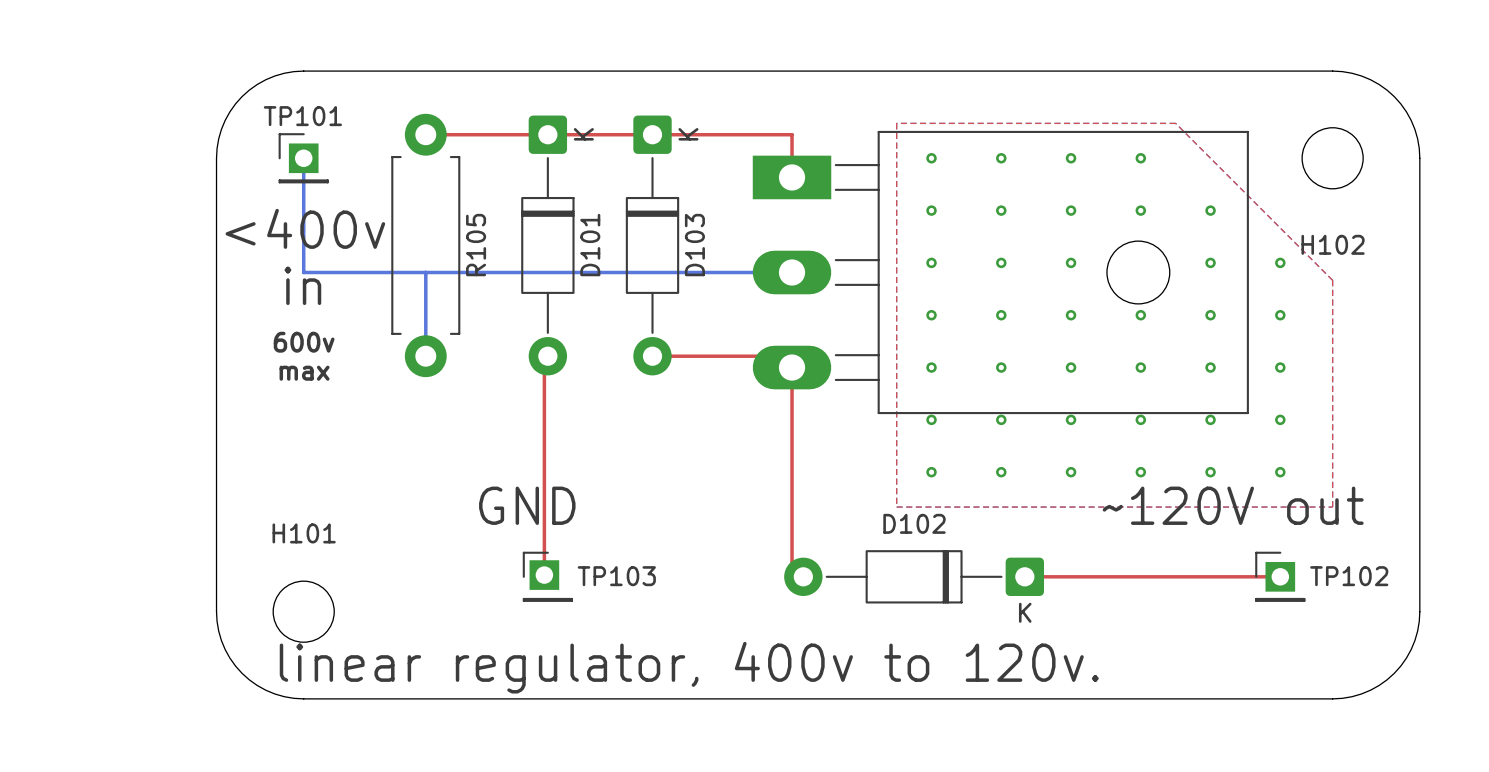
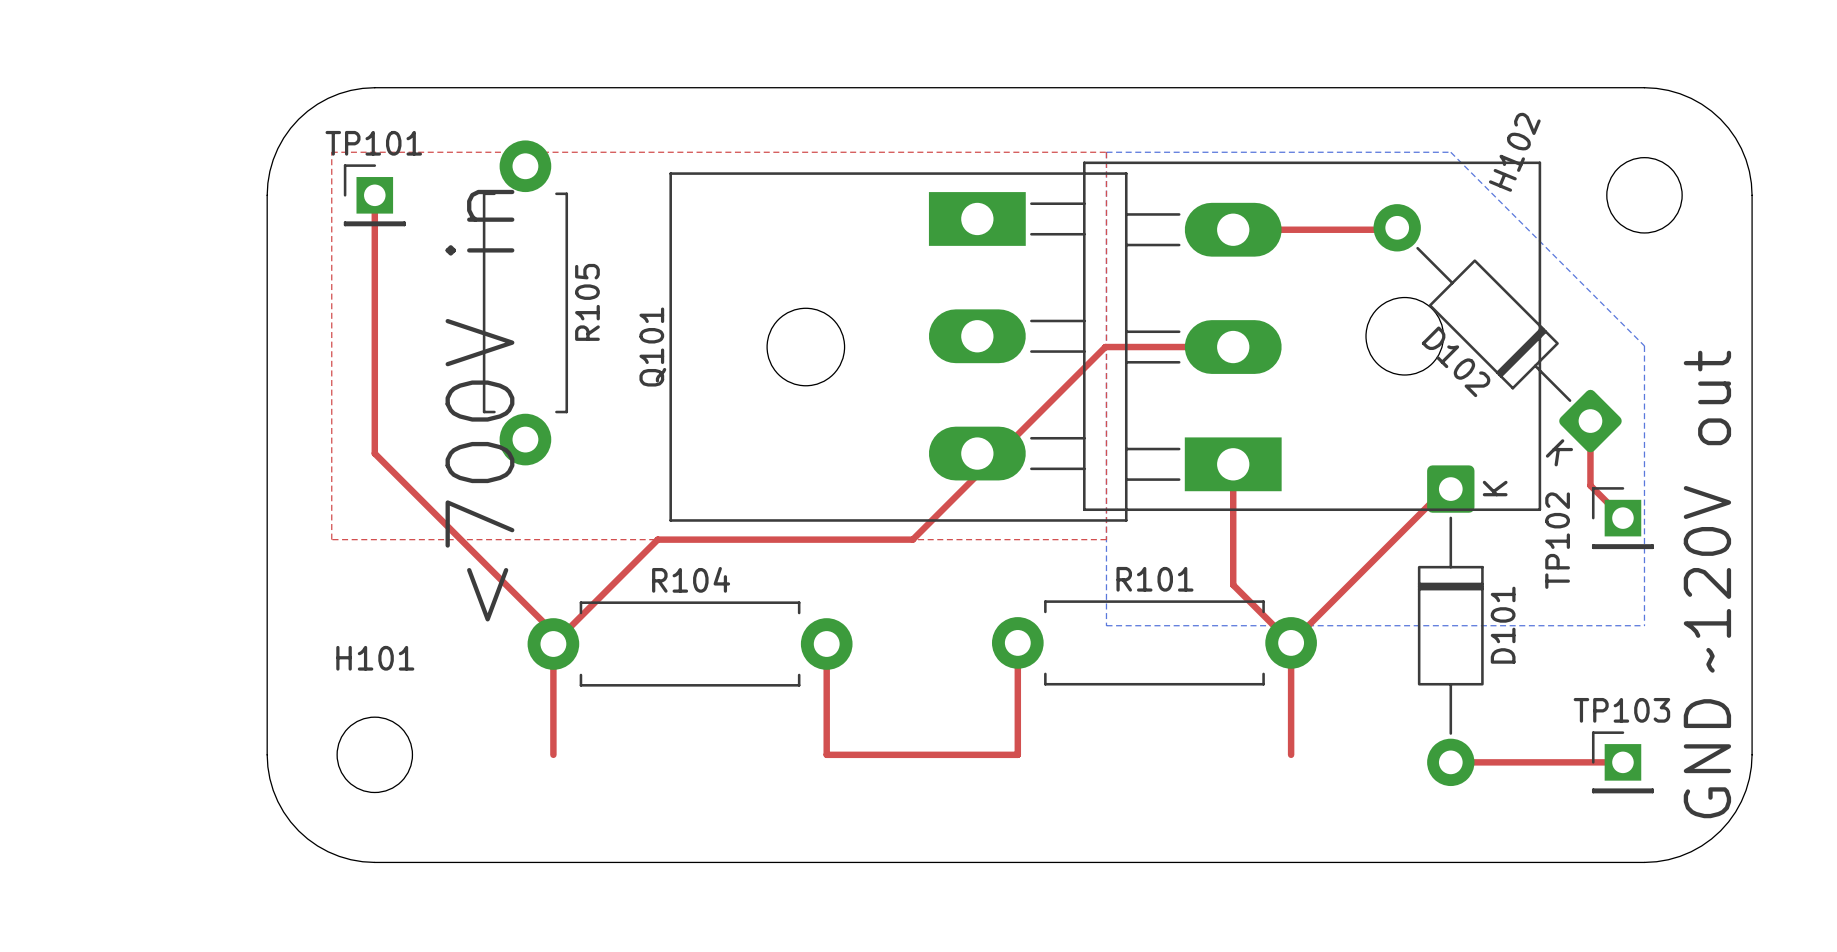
top zone outline: (896, 123) (1175, 123) (1332, 280) (1332, 507) (896, 507) (896, 437) -> (1106, 152) (331, 152) (331, 539) (1106, 539)
top track: (425, 134) (792, 134) (792, 177) -> none
top track: none -> (374, 195) (374, 453) (546, 625) (546, 637) (553, 644)
bottom track: (303, 158) (303, 272) (792, 272) -> none
via: (931, 158) -> none
via: (1001, 158) -> none
via: (1071, 158) -> none
via: (1140, 158) -> none
top track: none -> (1397, 227) (1395, 229) (1233, 229)
via: (931, 210) -> none
via: (1001, 210) -> none
via: (1071, 210) -> none
via: (1140, 210) -> none
via: (1210, 210) -> none
text: <400v (305, 228) -> none
H102 name rotation: 0° (1333, 244) -> 67.5° counterclockwise (1514, 152)
H102 name position: H102 (1333, 244) -> H102 (1514, 152)
D101 position: (547, 245) -> (1450, 625)
D103: (652, 245) -> none
via: (931, 262) -> none
via: (1001, 262) -> none
via: (1071, 262) -> none
via: (1210, 262) -> none
via: (1280, 262) -> none
bottom track: (425, 272) (425, 356) -> none
Q101: none -> (975, 347)
top track: none -> (1233, 347) (1105, 347) (912, 539) (657, 539) (553, 644)
text: in (302, 285) -> none
via: (931, 315) -> none
via: (1001, 315) -> none
via: (1071, 315) -> none
via: (1140, 315) -> none
via: (1210, 315) -> none
via: (1280, 315) -> none
text: none -> <700V in (479, 405)
top track: none -> (1590, 421) (1590, 485) (1622, 518)
text: 600v (304, 342) -> none
top track: (547, 356) (544, 359) (544, 575) -> none
top track: (652, 356) (780, 356) (803, 378) -> none
top track: (792, 367) (792, 565) (803, 576) -> none
via: (931, 367) -> none
via: (1001, 367) -> none
via: (1071, 367) -> none
via: (1140, 367) -> none
via: (1210, 367) -> none
via: (1280, 367) -> none
text: max (304, 373) -> none
top track: none -> (1233, 464) (1233, 585) (1291, 642)
top track: none -> (1450, 489) (1444, 489) (1291, 642)
via: (931, 419) -> none
via: (1001, 419) -> none
via: (1071, 419) -> none
via: (1140, 419) -> none
via: (1210, 419) -> none
via: (1280, 419) -> none
via: (931, 472) -> none
via: (1001, 472) -> none
via: (1071, 472) -> none
via: (1140, 472) -> none
via: (1210, 472) -> none
via: (1280, 472) -> none
text: GND (527, 505) -> none
text rotation: 0° (1233, 505) -> 90° counterclockwise (1707, 511)
top track: none -> (553, 644) (553, 754)
R104: none -> (690, 644)
top track: none -> (1017, 642) (1017, 754) (826, 754) (826, 644)
R101: none -> (1154, 642)
top track: none -> (1291, 642) (1291, 754)
D102 name position: D102 (914, 523) -> D102 (1456, 361)
TP103 footprint: [522, 551, 573, 602] -> [1591, 731, 1654, 794]
TP103 name position: TP103 (616, 576) -> TP103 (1621, 710)
D102 rotation: 0° (914, 576) -> 45° clockwise (1497, 328)
D102 position: (914, 576) -> (1497, 328)
top track: (1024, 576) (1280, 576) -> none
TP102 position: (1280, 576) -> (1622, 518)
TP102 name rotation: 0° (1349, 576) -> 90° counterclockwise (1557, 540)
TP102 name position: TP102 (1349, 576) -> TP102 (1557, 540)
text: none -> GND (1707, 758)
top track: none -> (1472, 762) (1622, 762)
text: linear regulator, 400v to 120v. (689, 667) -> none

